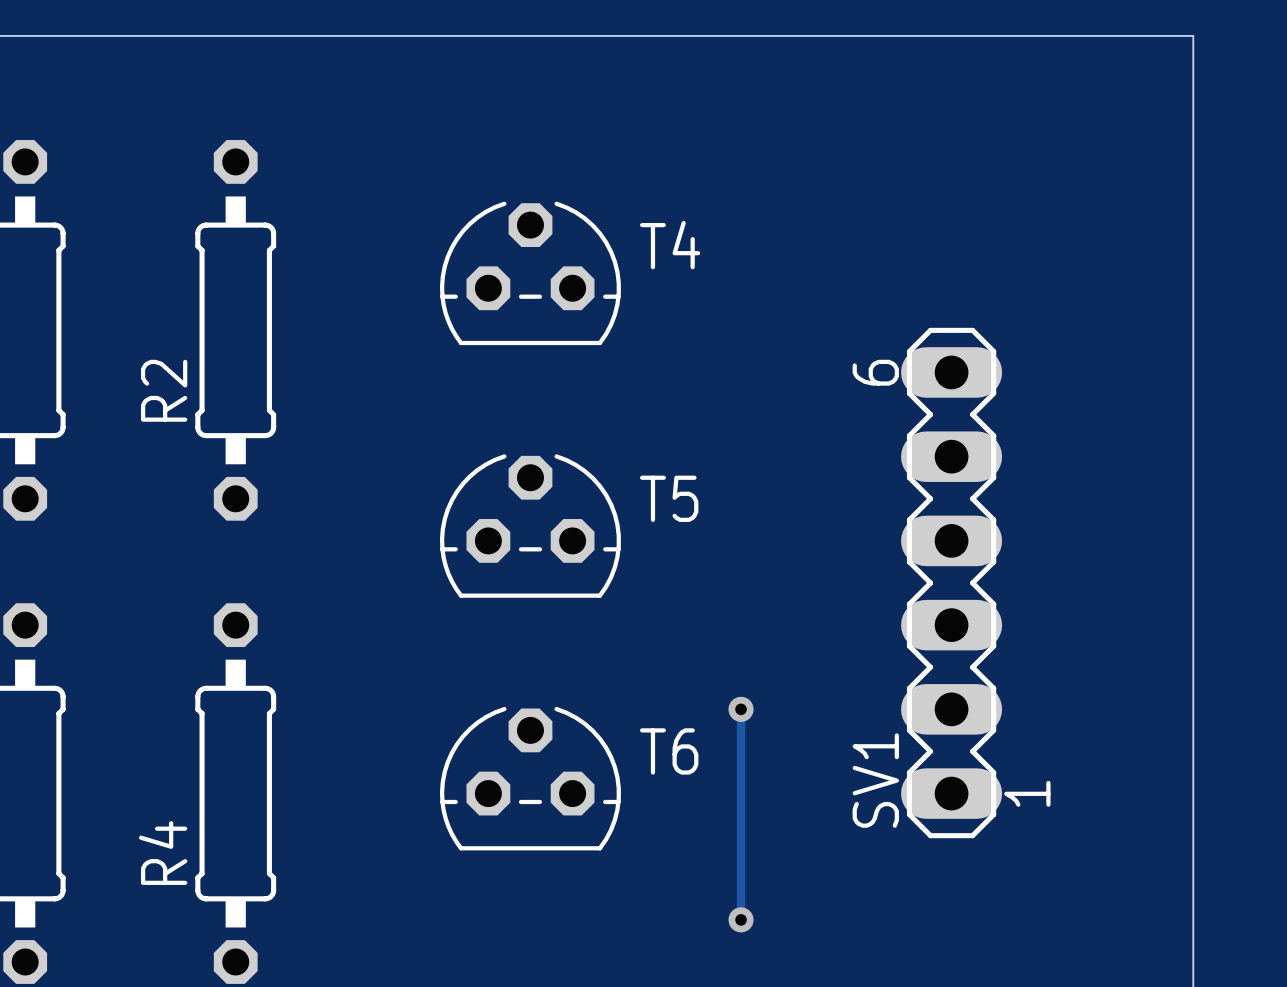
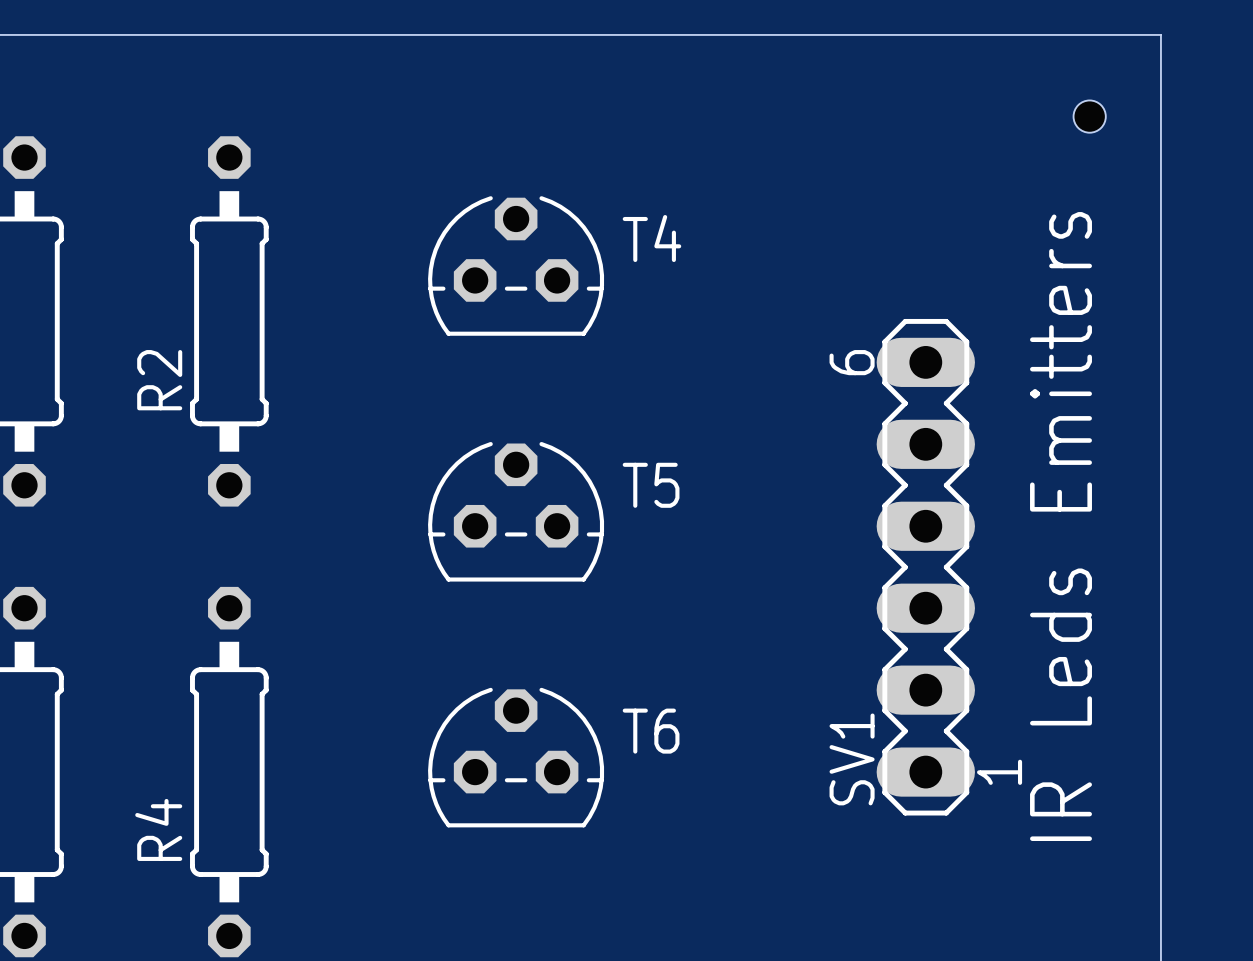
hole: none -> (1089, 116)
text: none -> IR Leds Emitters (1061, 526)
track: (741, 709) (741, 919) -> none
via: (741, 709) -> none
via: (741, 919) -> none

